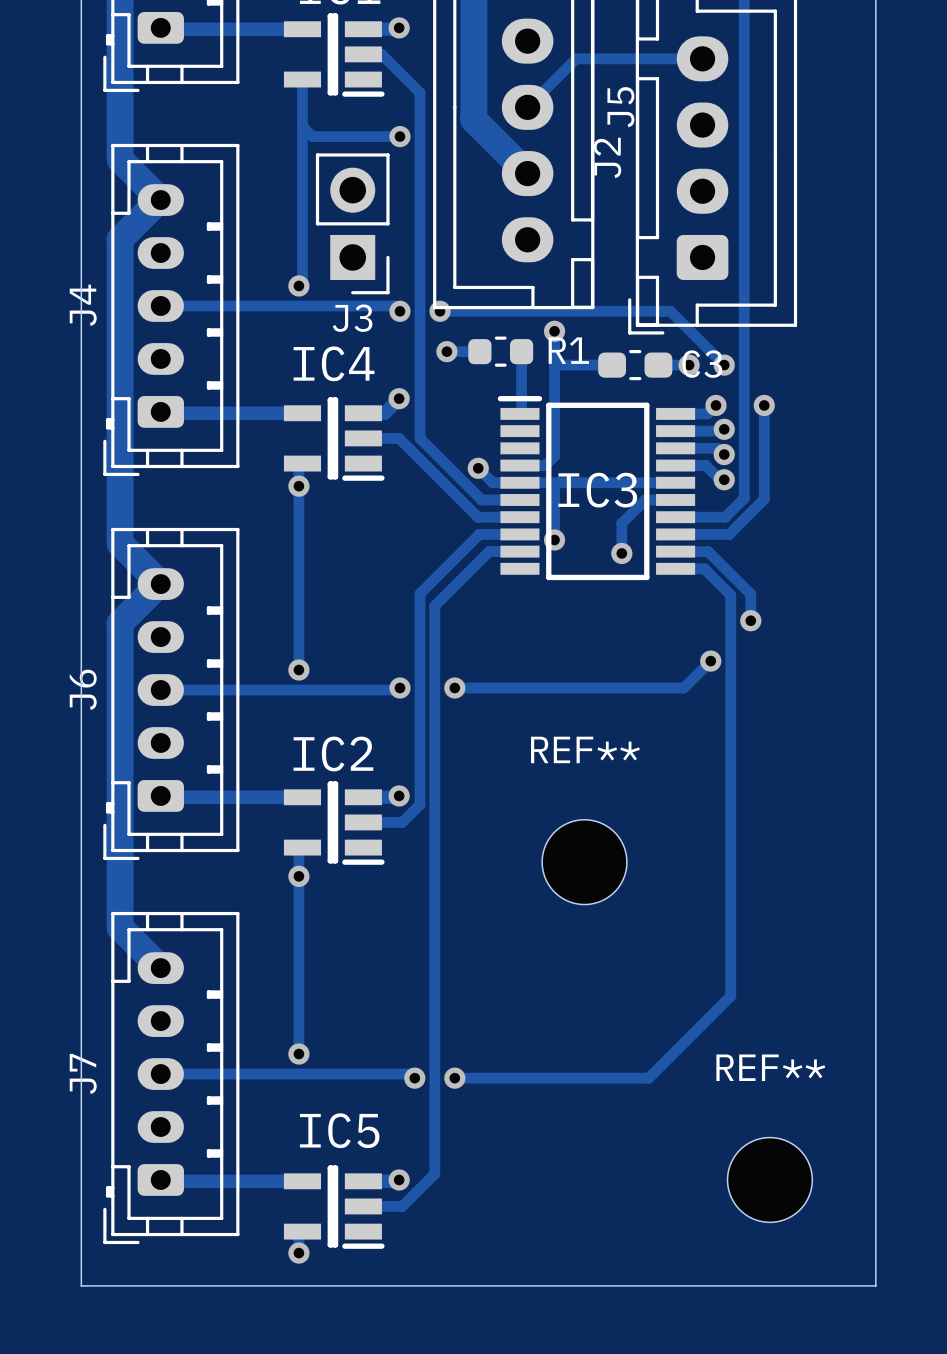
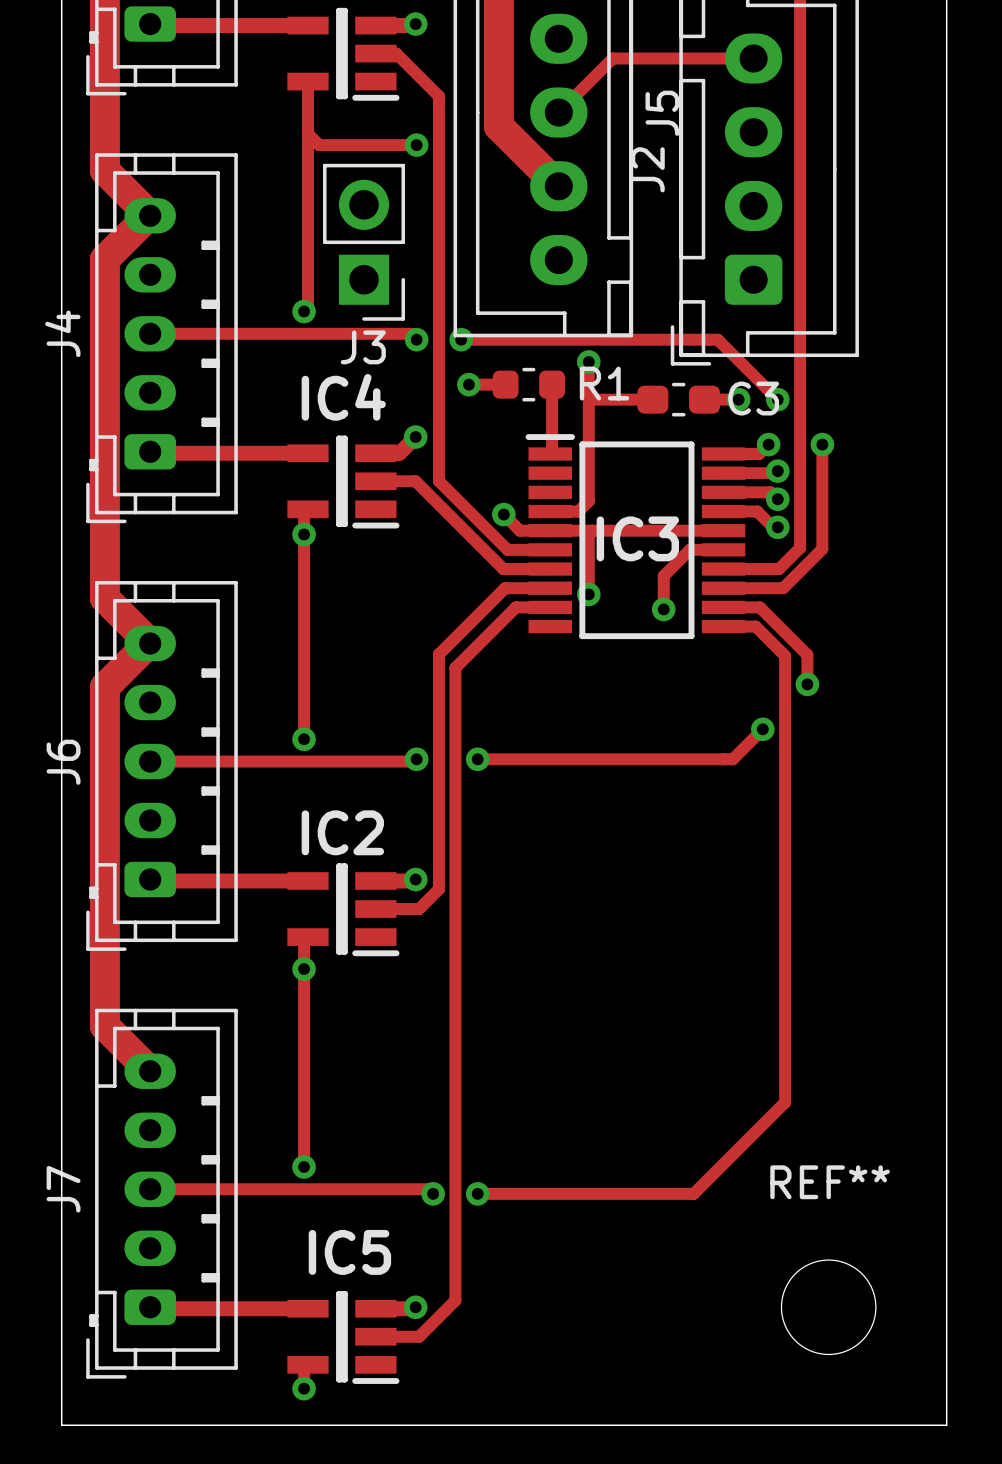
REF**: (584, 862) -> none

